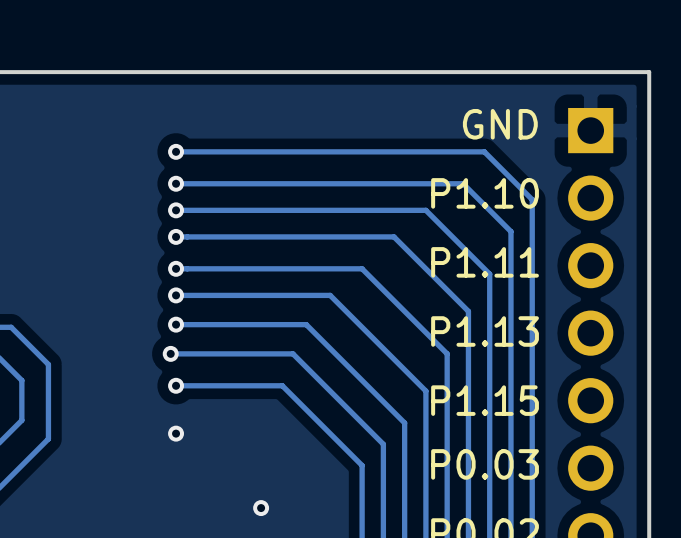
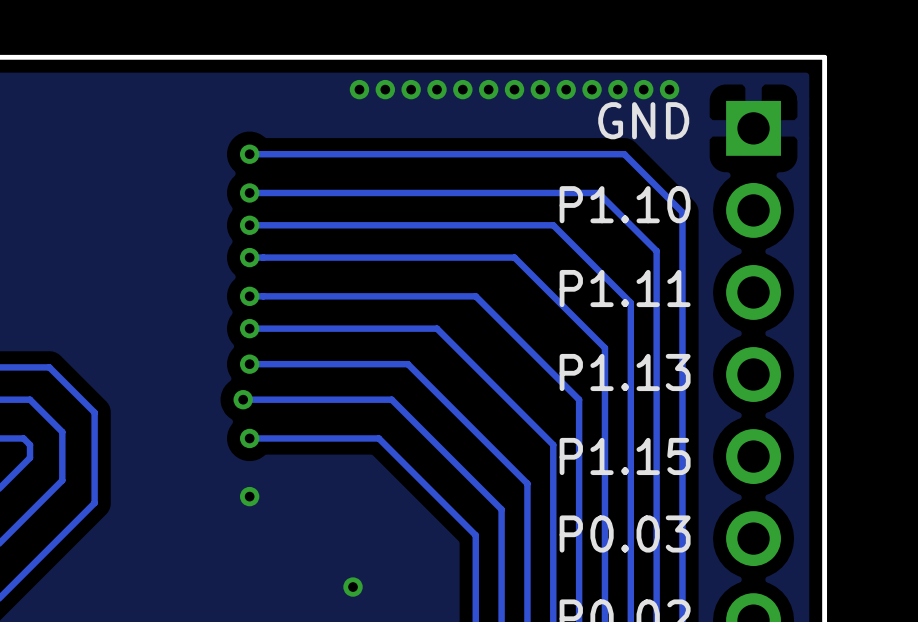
via: none -> (359, 89)
via: none -> (385, 89)
via: none -> (411, 89)
via: none -> (437, 89)
via: none -> (462, 89)
via: none -> (488, 89)
via: none -> (514, 89)
via: none -> (540, 89)
via: none -> (566, 89)
via: none -> (592, 89)
via: none -> (617, 89)
via: none -> (643, 89)
via: none -> (669, 89)

